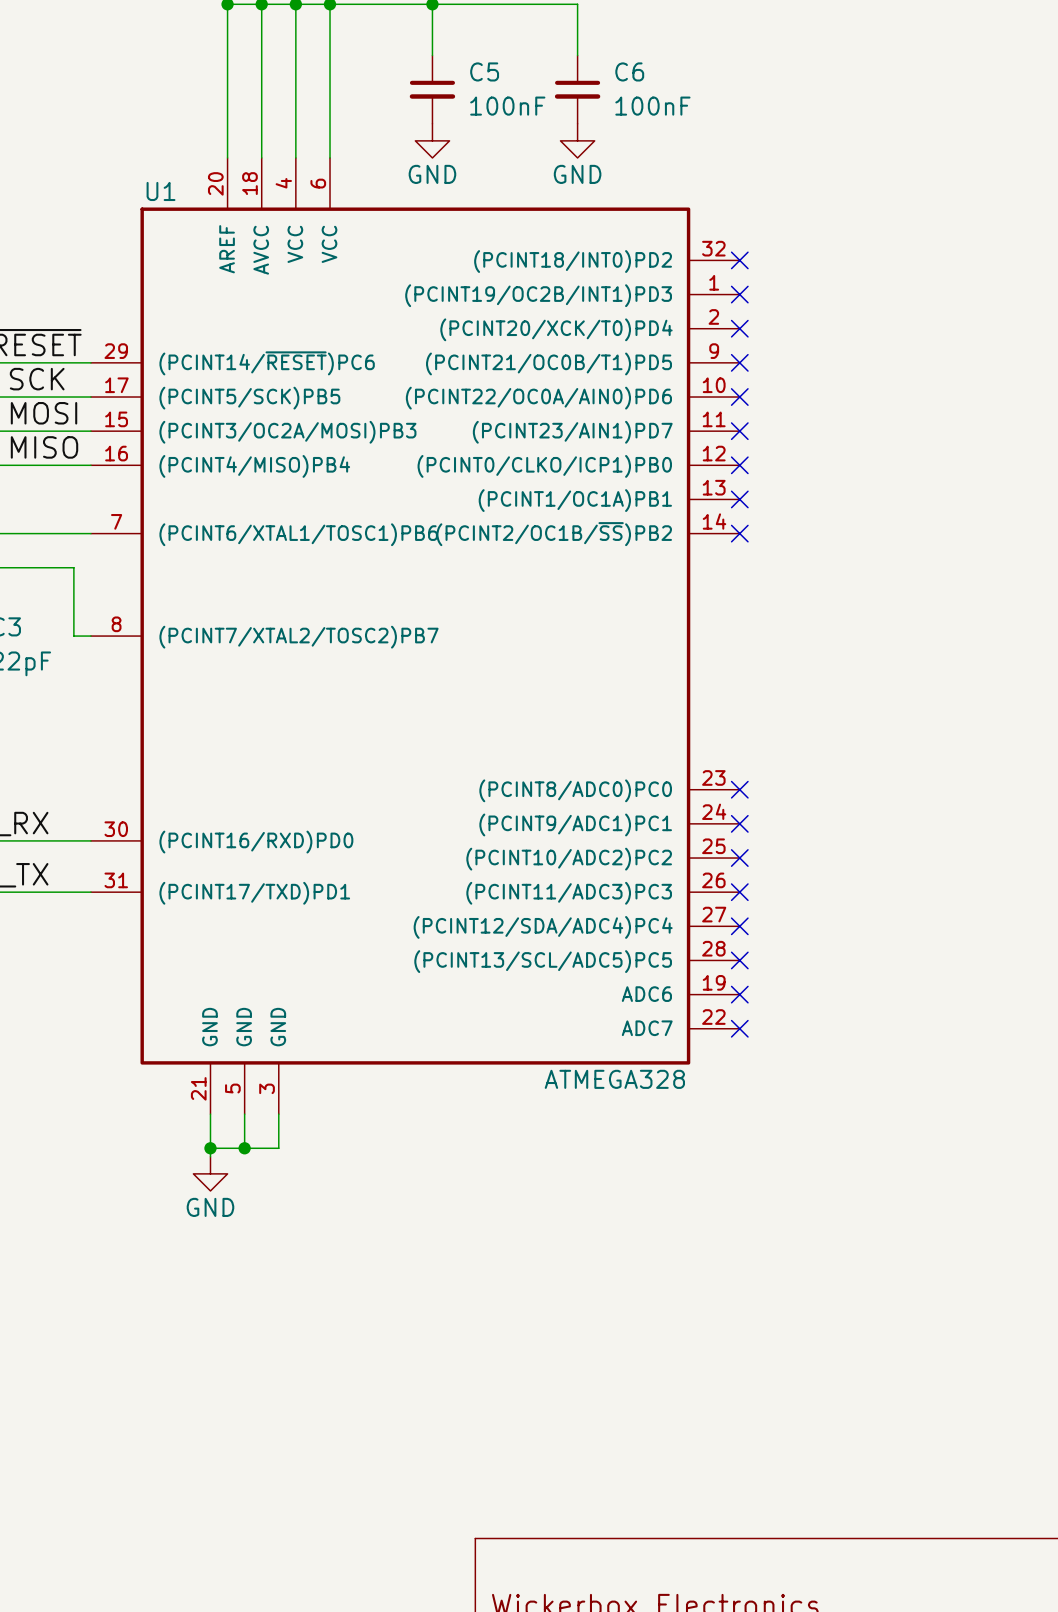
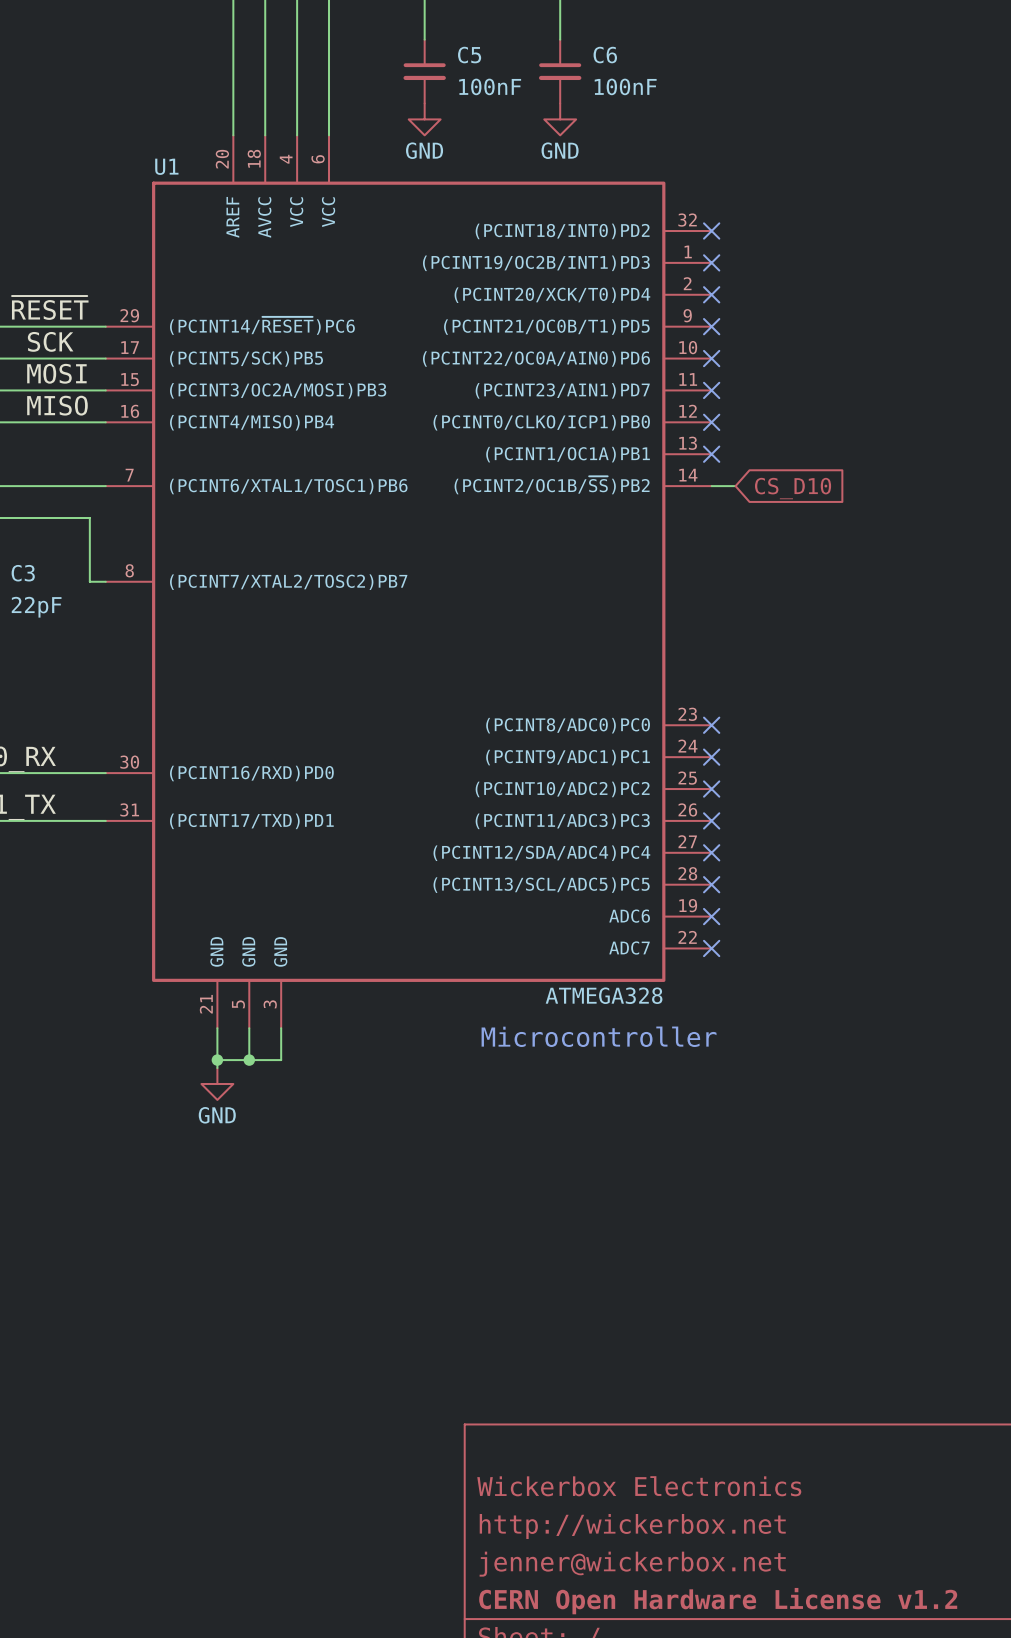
wire: none -> (711, 486) (735, 486)
no-connect mark: (739, 533) -> none
global label: none -> CS_D10 (793, 488)
text: none -> Microcontroller (599, 1036)

